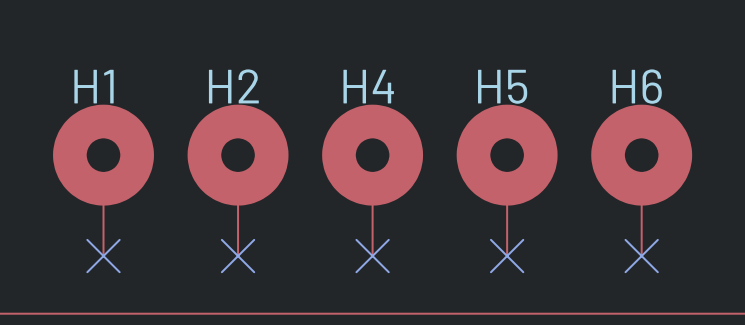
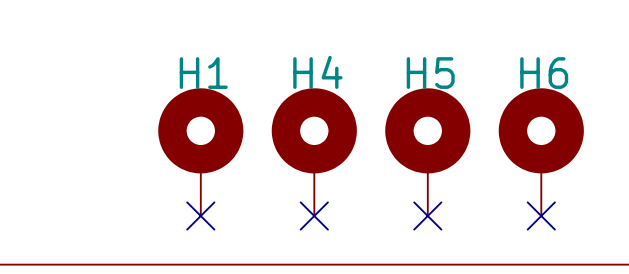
H2 name: H2 (233, 86) -> H1 (203, 73)
H1: (103, 180) -> none
no-connect mark: (103, 256) -> none

